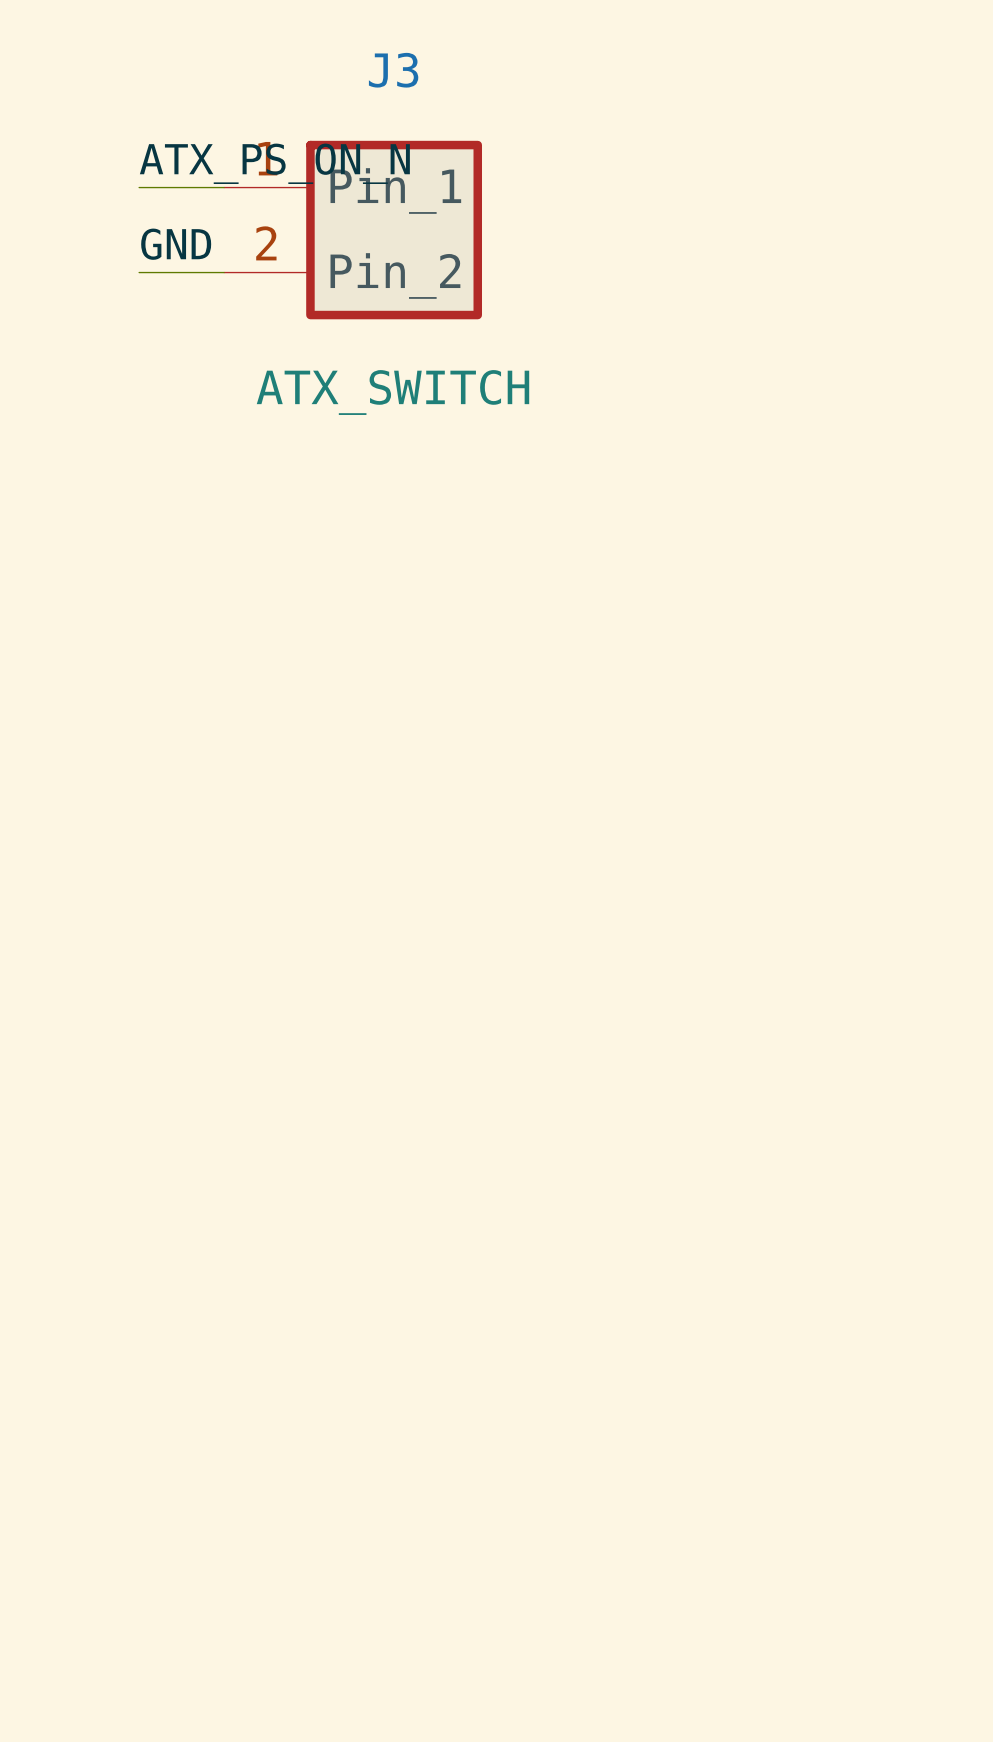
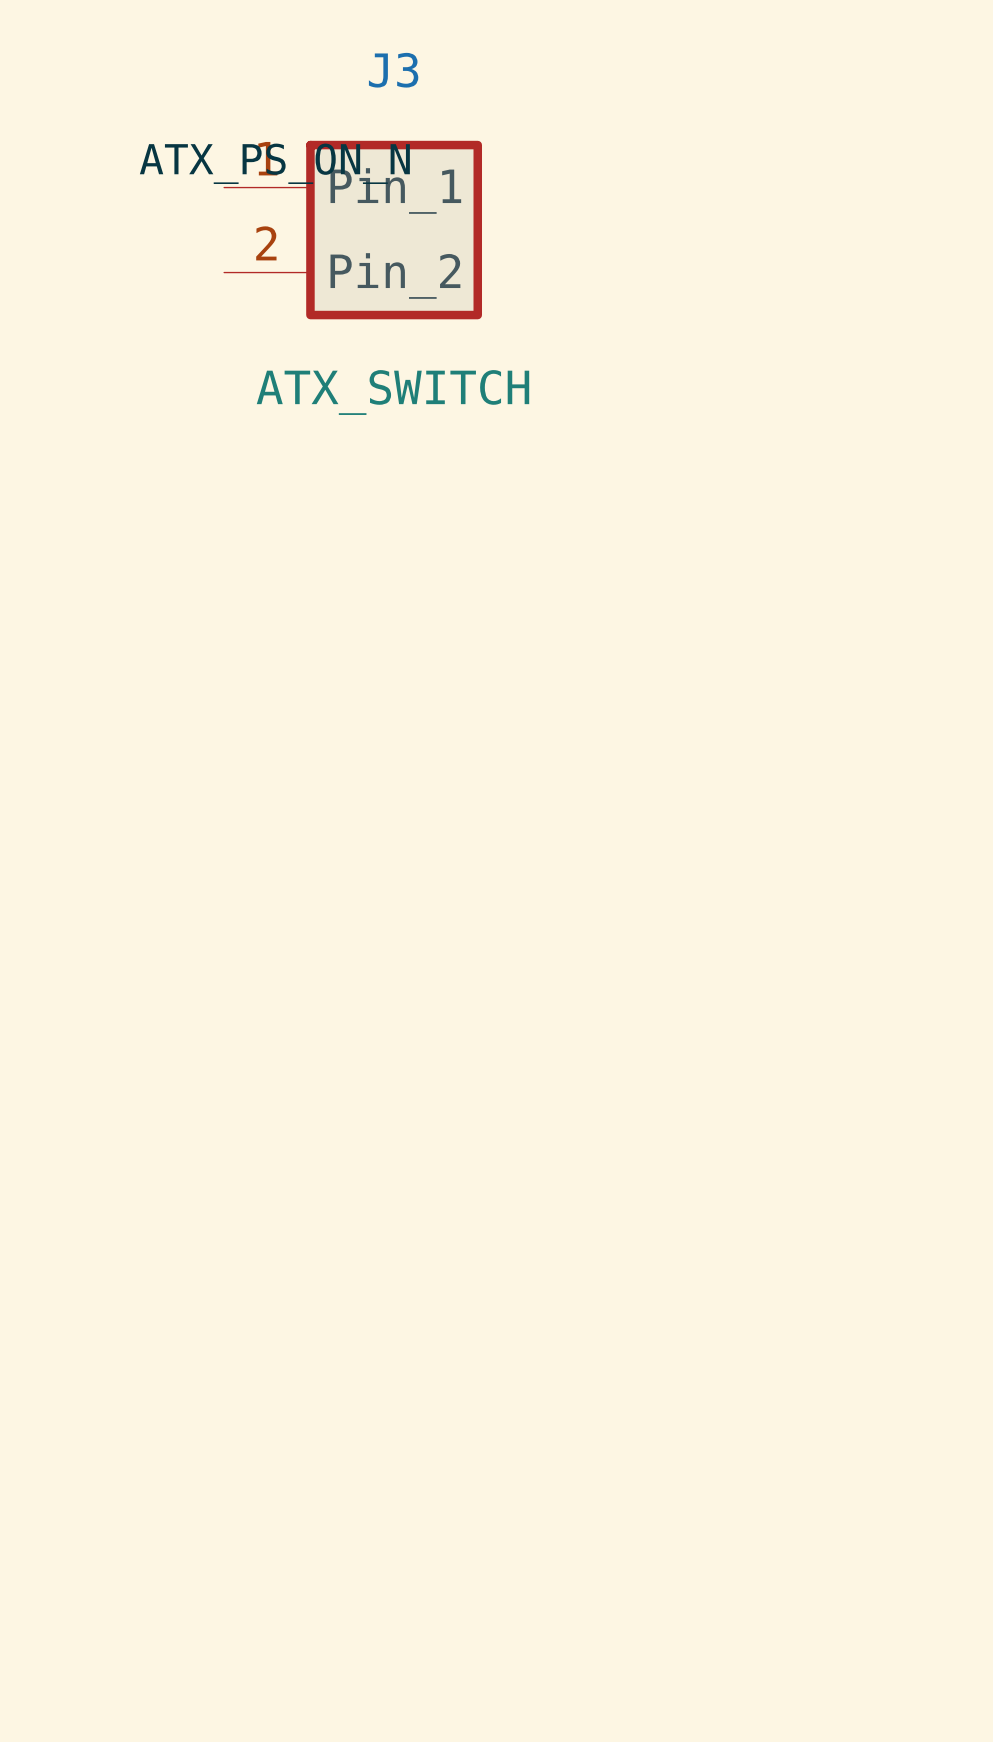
wire: (139, 187) (224, 187) -> none
label: GND (176, 244) -> none
wire: (139, 272) (224, 272) -> none

